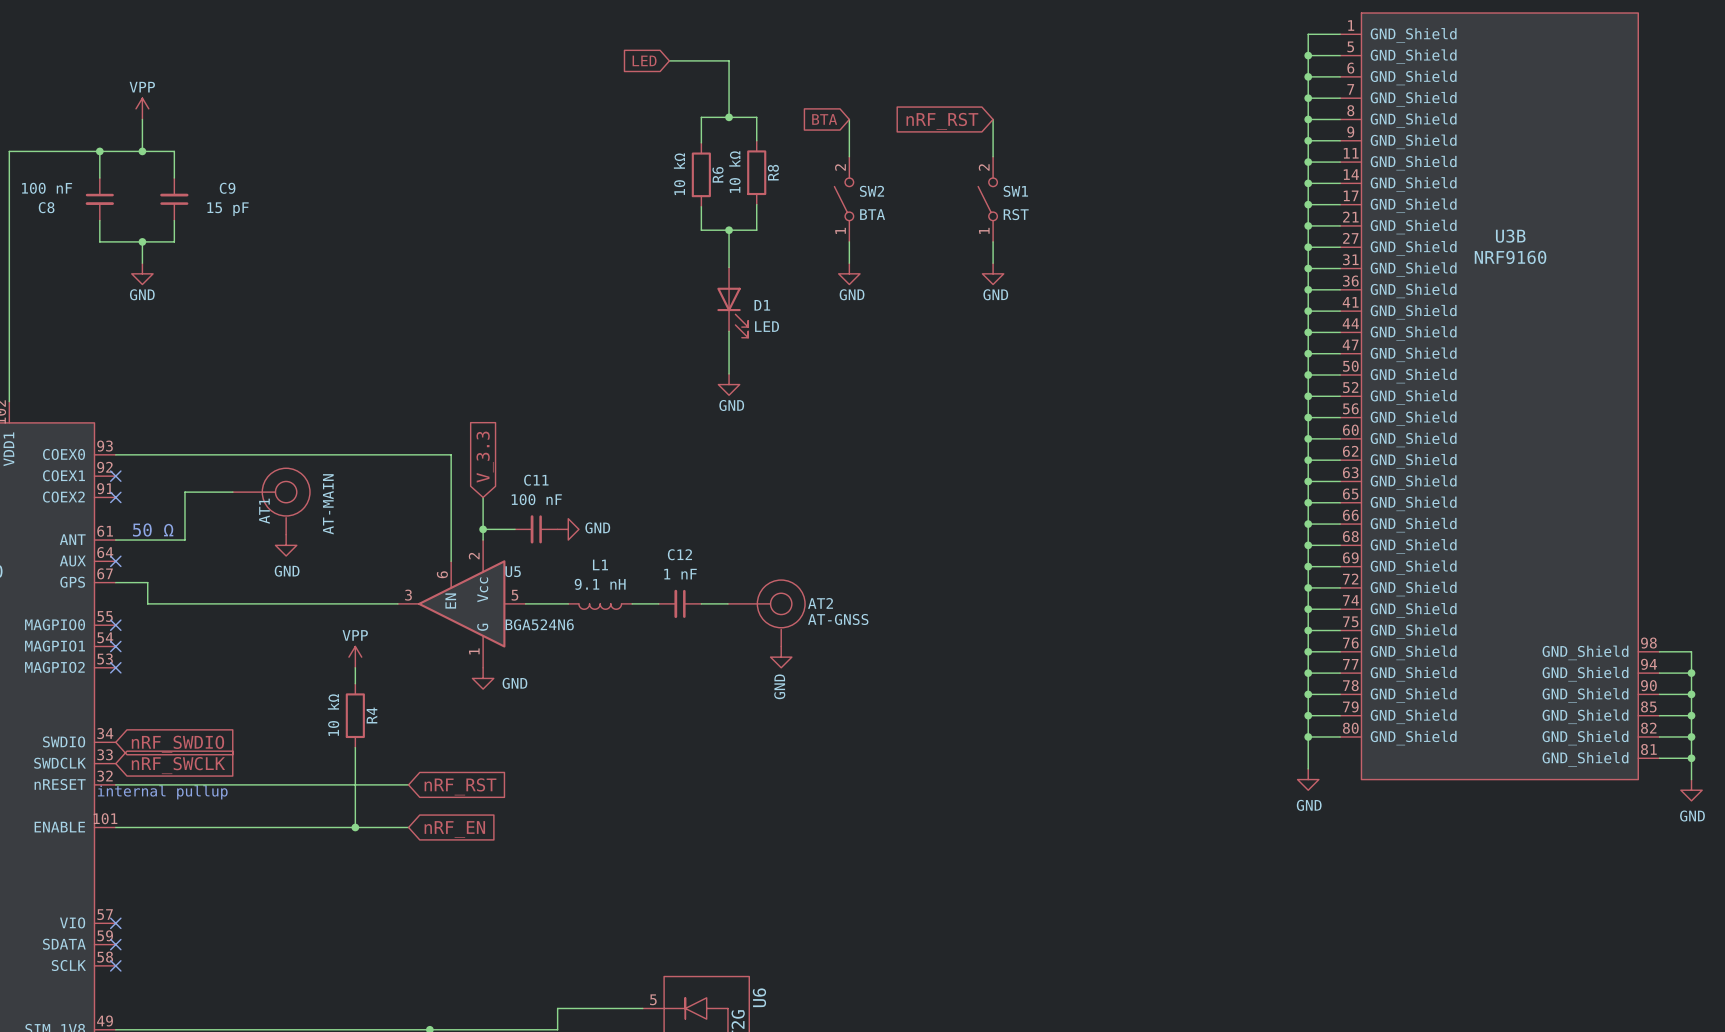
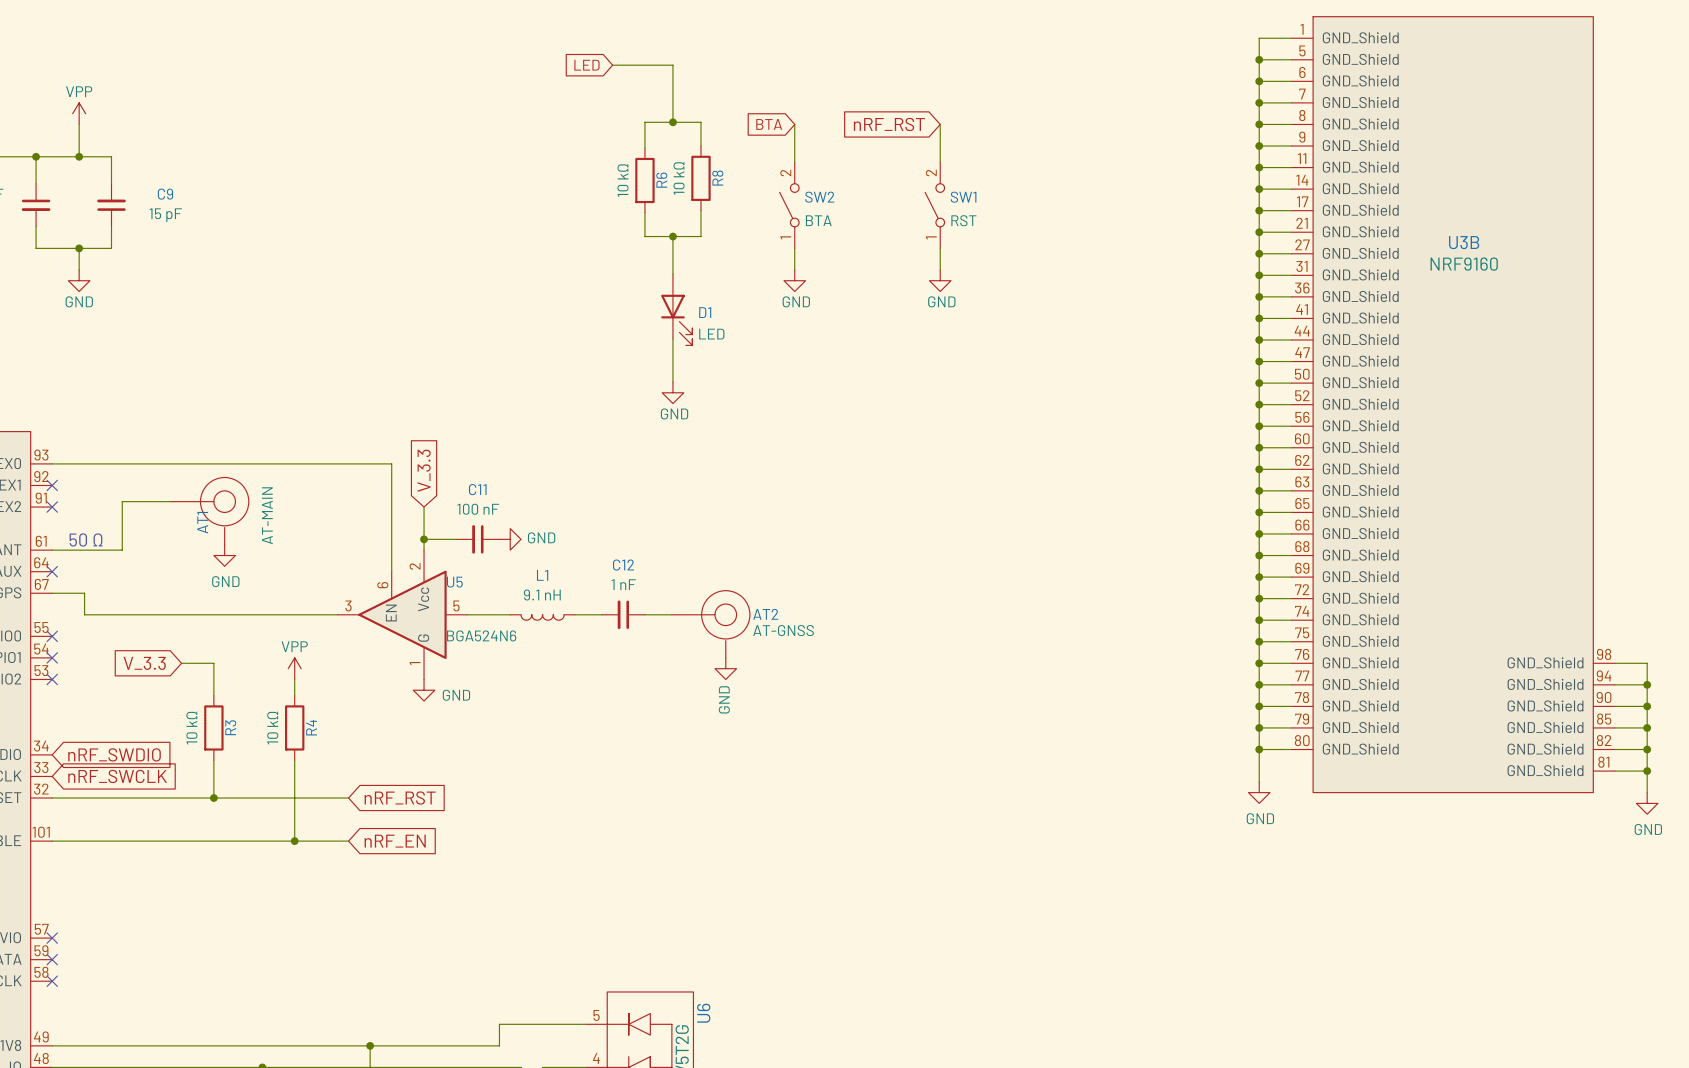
wire: none -> (181, 663) (213, 663) (213, 695)
global label: none -> V_3.3 (144, 663)
R3: none -> 10 kΩ (213, 727)
wire: none -> (213, 760) (213, 798)
junction: none -> (213, 798)
text: internal pullup (162, 792) -> none

